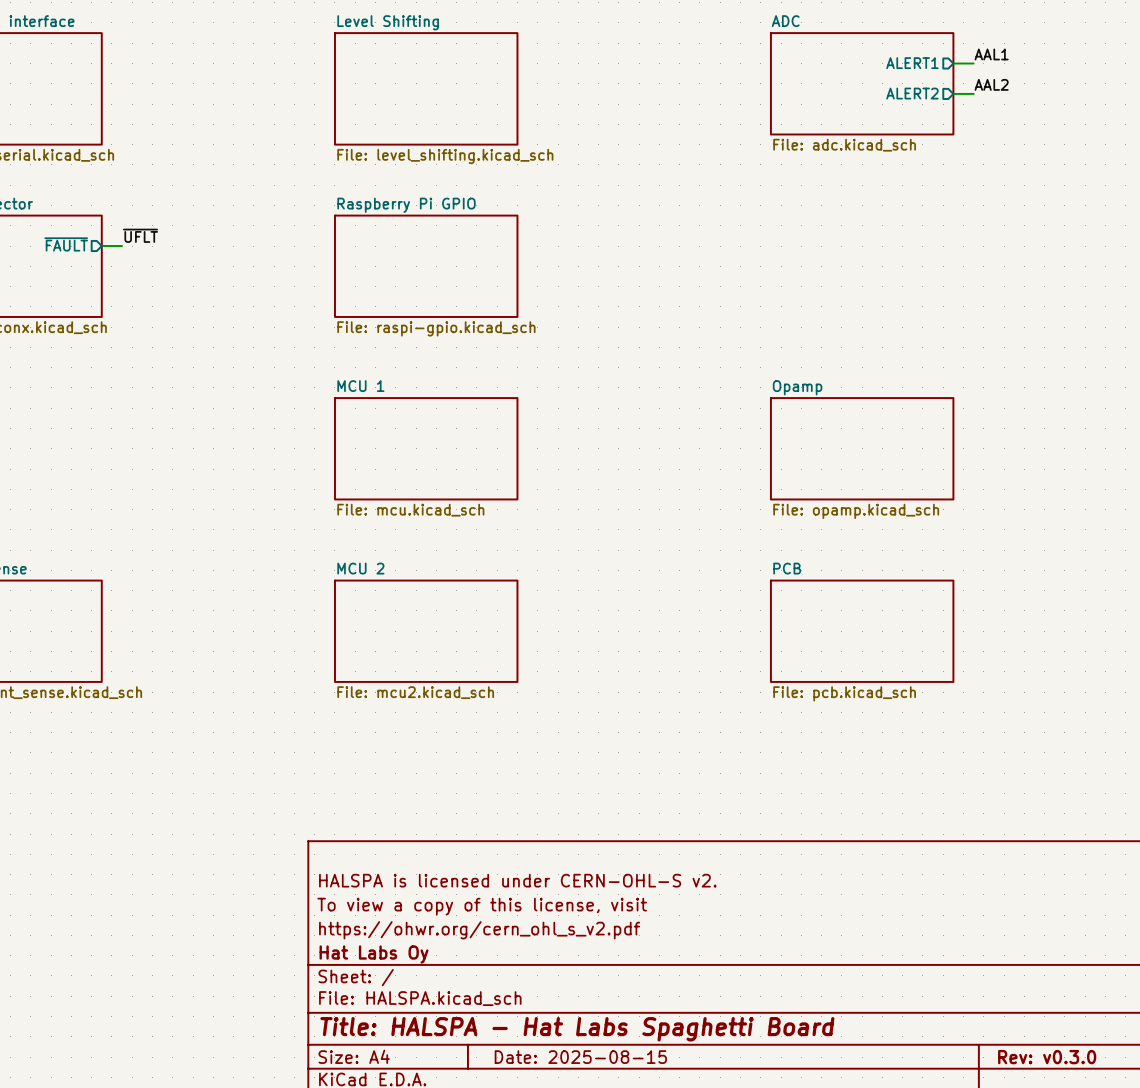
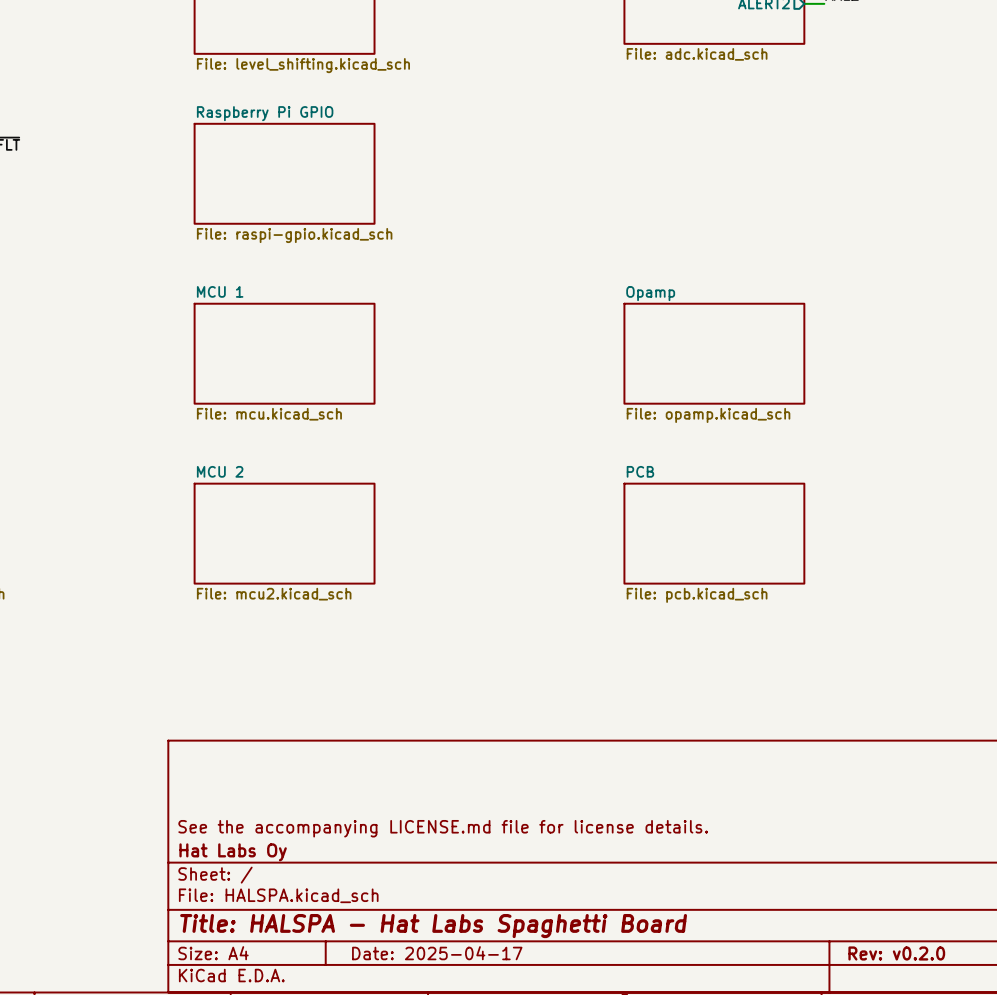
title block: HALSPA is licensed under CERN-OHL-S v2. (517, 880) -> none
title block: To view a copy of this license, visit (482, 906) -> none
title block: https://ohwr.org/cern_ohl_s_v2.pdf (479, 930) -> See the accompanying LICENSE.md file for license details. (443, 828)
title block: Date: 2025-08-15 (580, 1057) -> Date: 2025-04-17 (437, 953)
title block: Rev: v0.3.0 (1047, 1057) -> Rev: v0.2.0 (896, 953)

